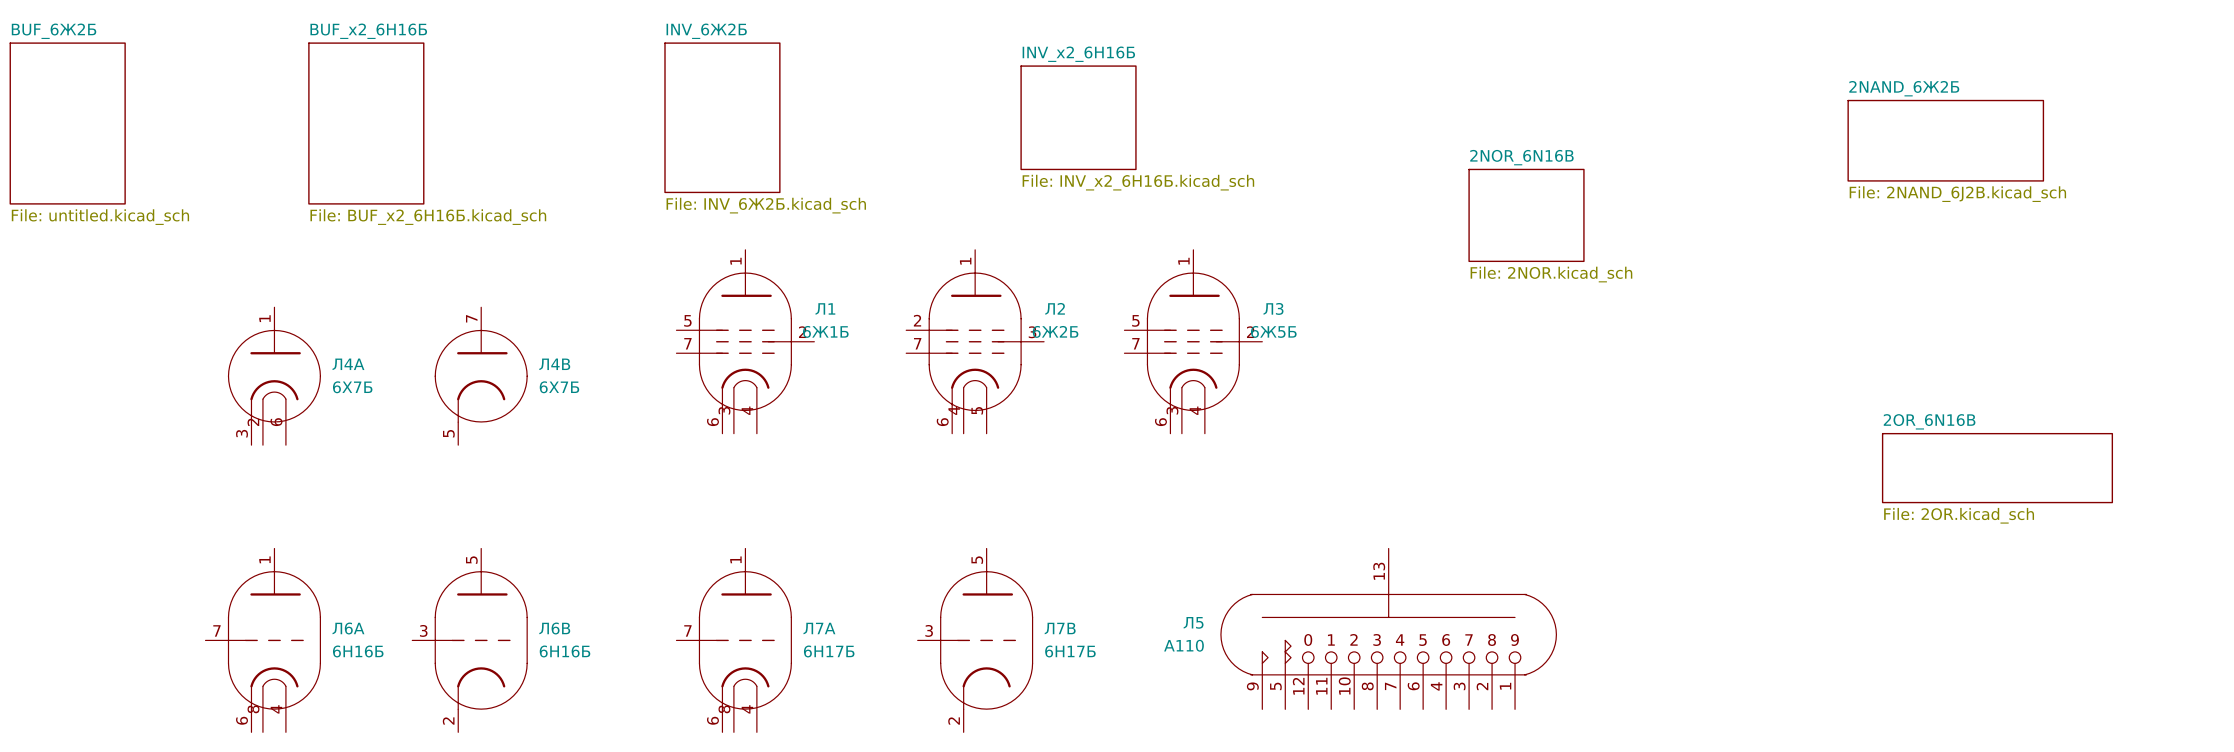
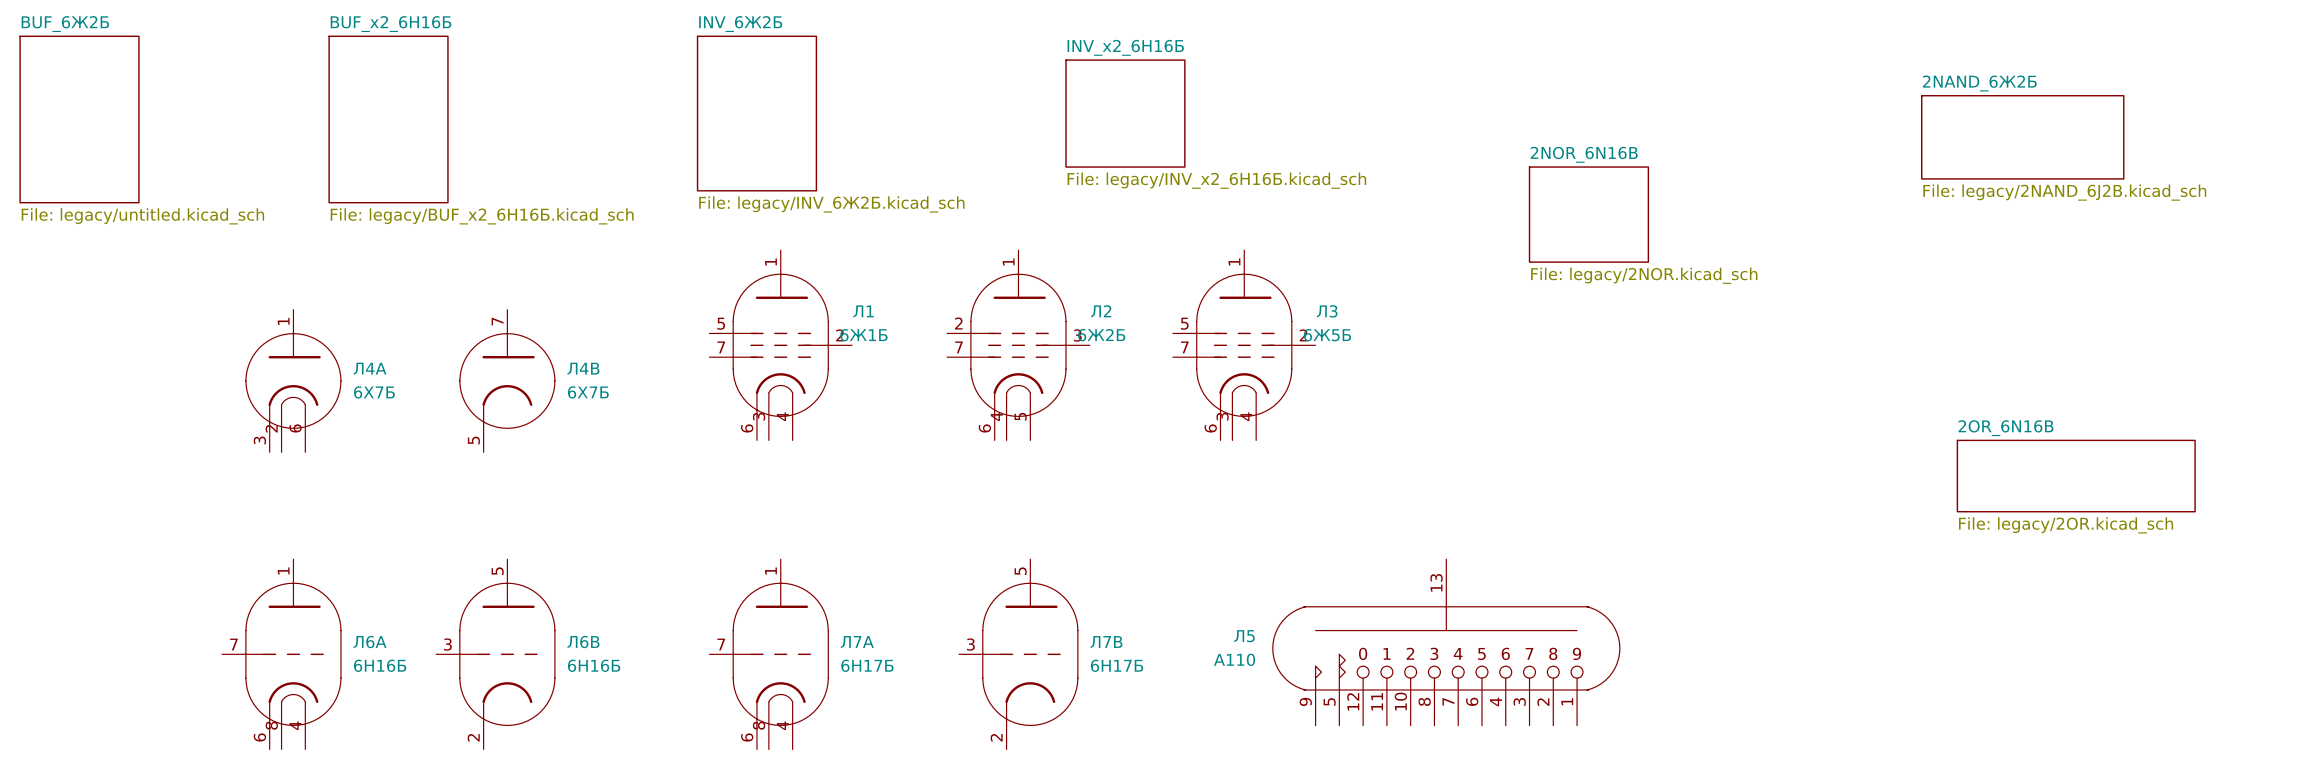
sheet INV_x2_6Н16Б value: File: INV_x2_6Н16Б.kicad_sch (1138, 182) -> File: legacy/INV_x2_6Н16Б.kicad_sch (1216, 180)
sheet 2NAND_6Ж2Б value: File: 2NAND_6J2B.kicad_sch (1957, 194) -> File: legacy/2NAND_6J2B.kicad_sch (2064, 192)
sheet INV_6Ж2Б value: File: INV_6Ж2Б.kicad_sch (766, 205) -> File: legacy/INV_6Ж2Б.kicad_sch (831, 204)
sheet BUF_6Ж2Б value: File: untitled.kicad_sch (100, 217) -> File: legacy/untitled.kicad_sch (142, 216)
sheet BUF_х2_6Н16Б value: File: BUF_х2_6Н16Б.kicad_sch (428, 217) -> File: legacy/BUF_х2_6Н16Б.kicad_sch (482, 216)
sheet 2NOR_6N16B value: File: 2NOR.kicad_sch (1551, 274) -> File: legacy/2NOR.kicad_sch (1644, 275)
sheet 2OR_6N16B value: File: 2OR.kicad_sch (1959, 515) -> File: legacy/2OR.kicad_sch (2066, 525)

